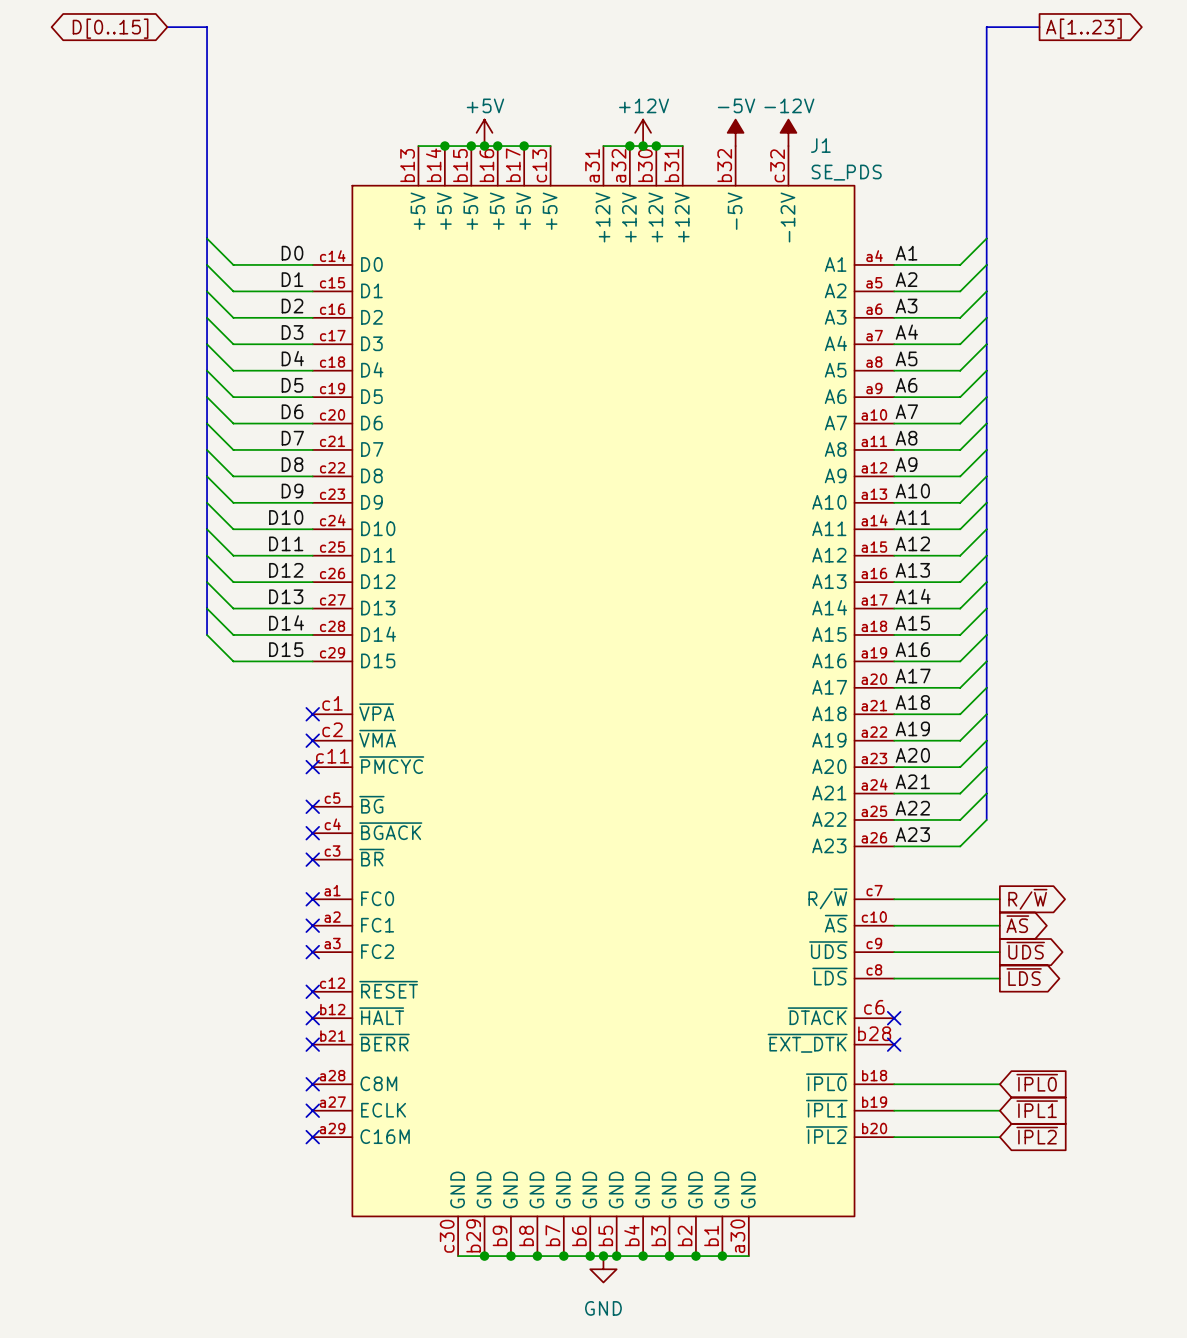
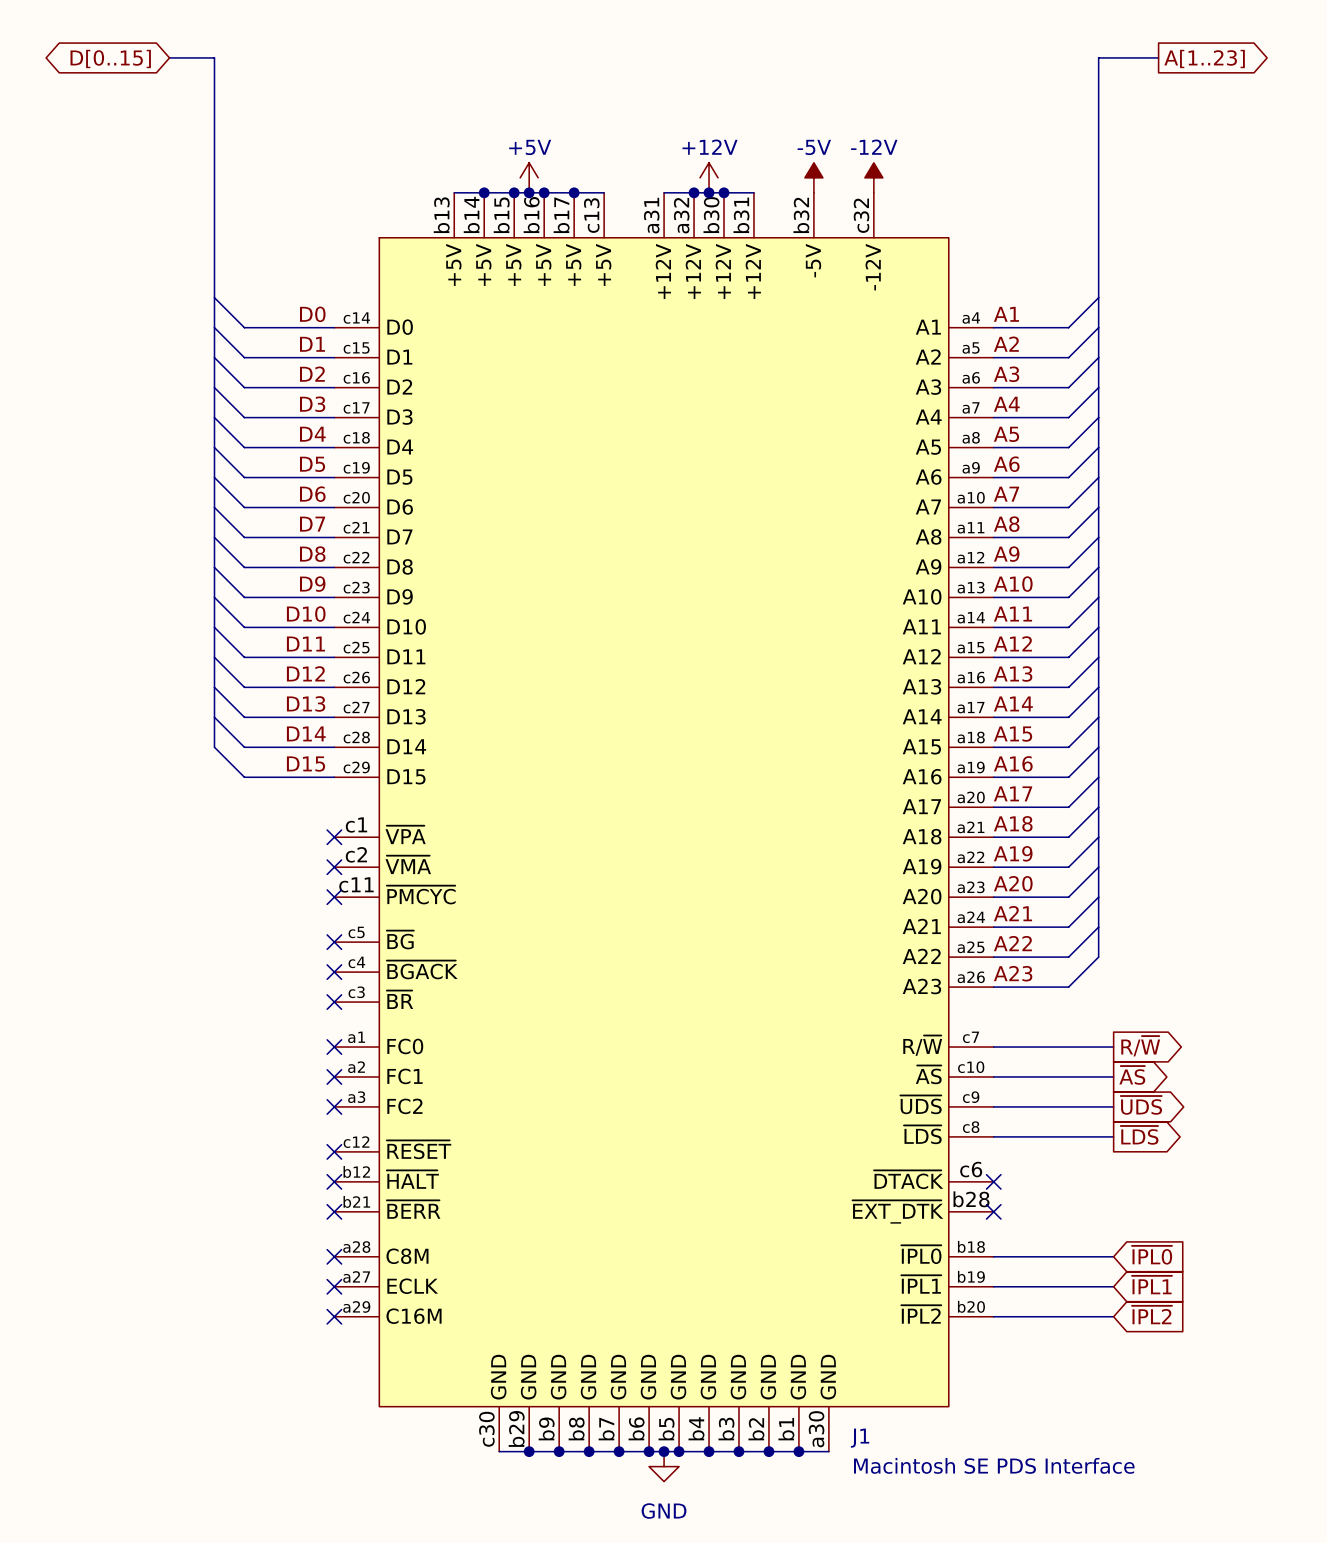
J1 name position: J1 (820, 145) -> J1 (860, 1438)
J1 value: SE_PDS (846, 172) -> Macintosh SE PDS Interface (994, 1465)

